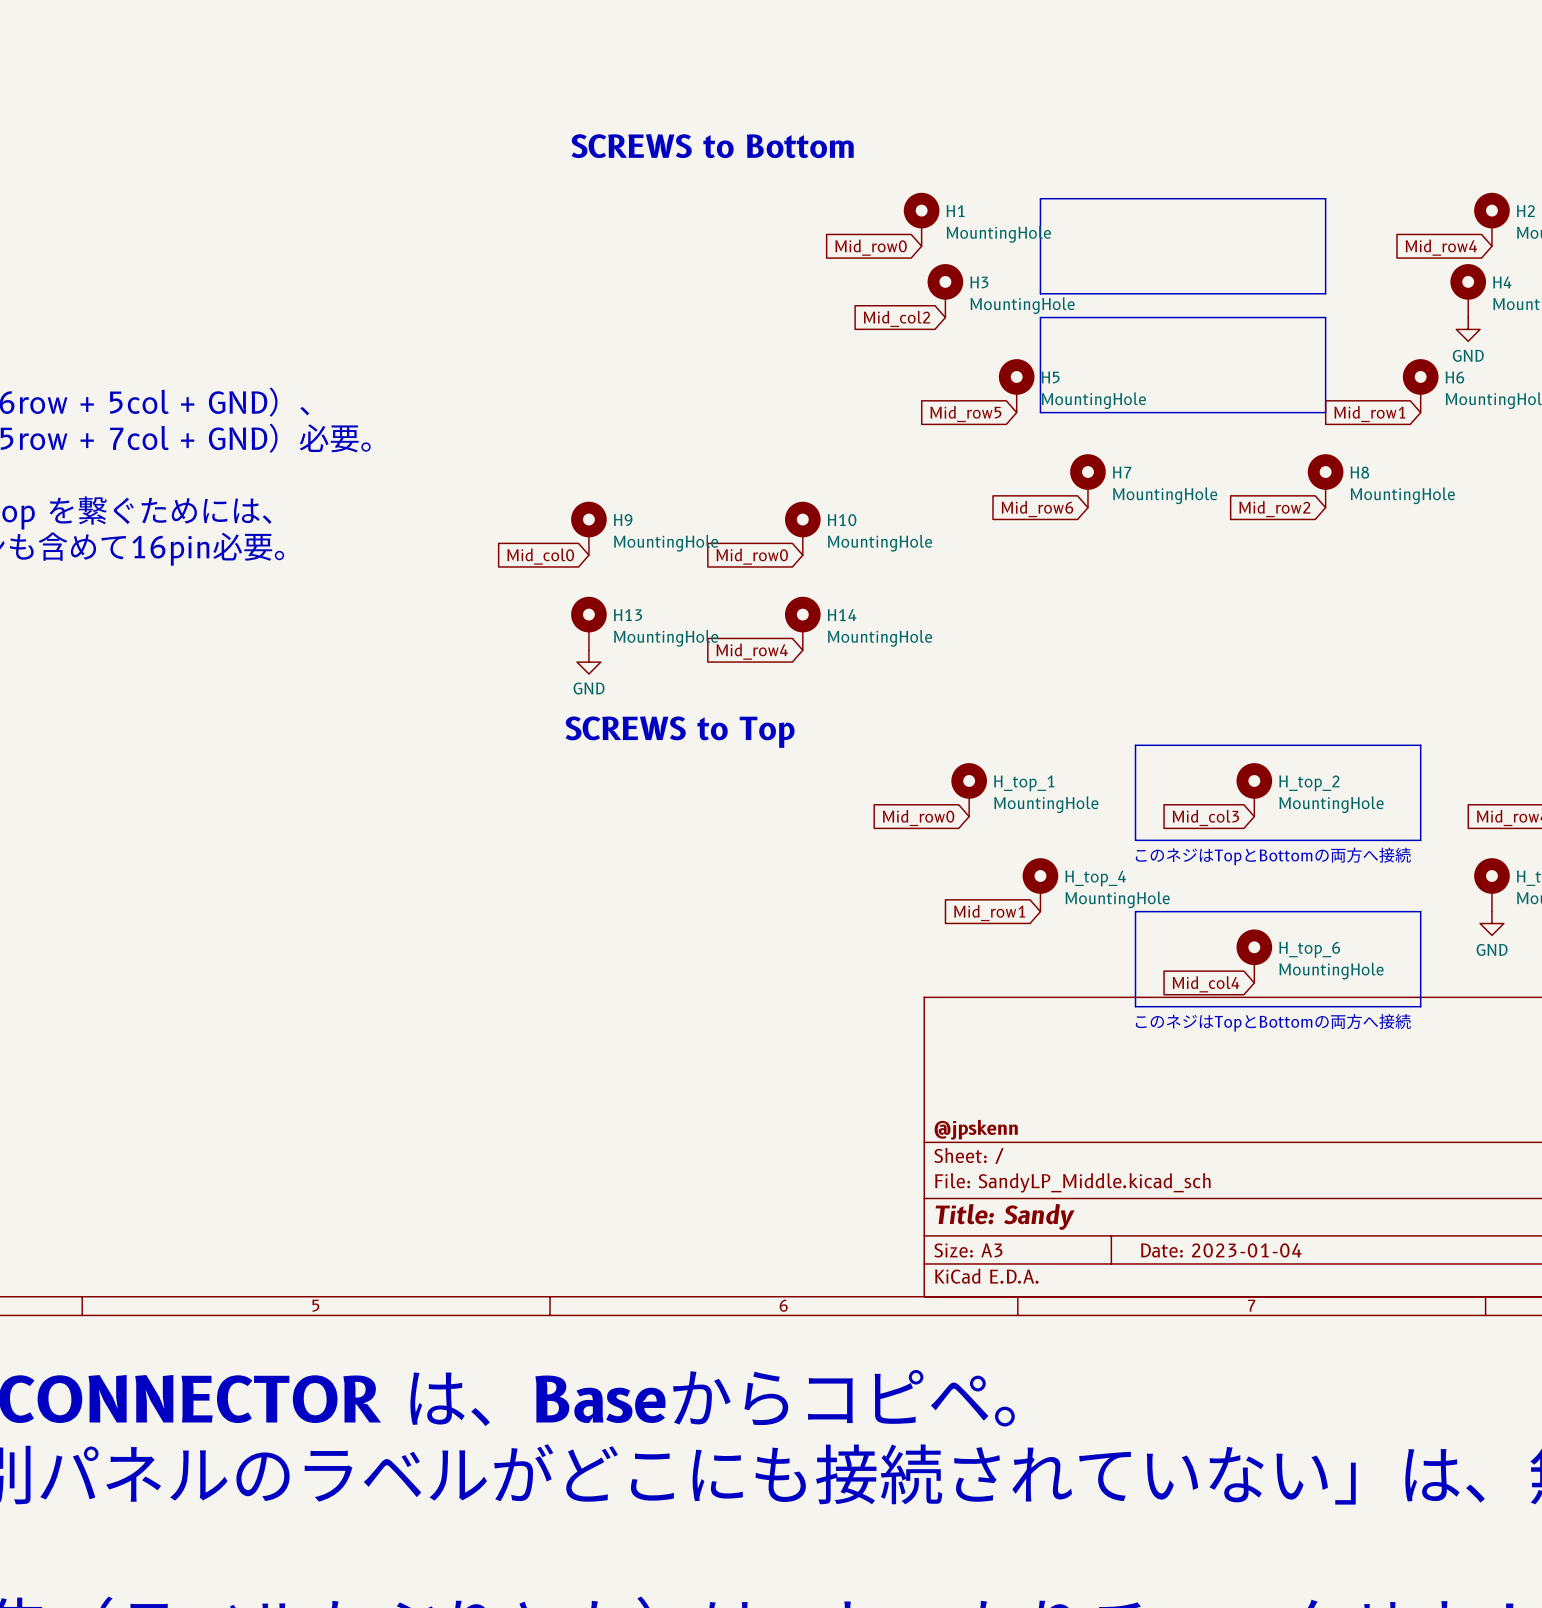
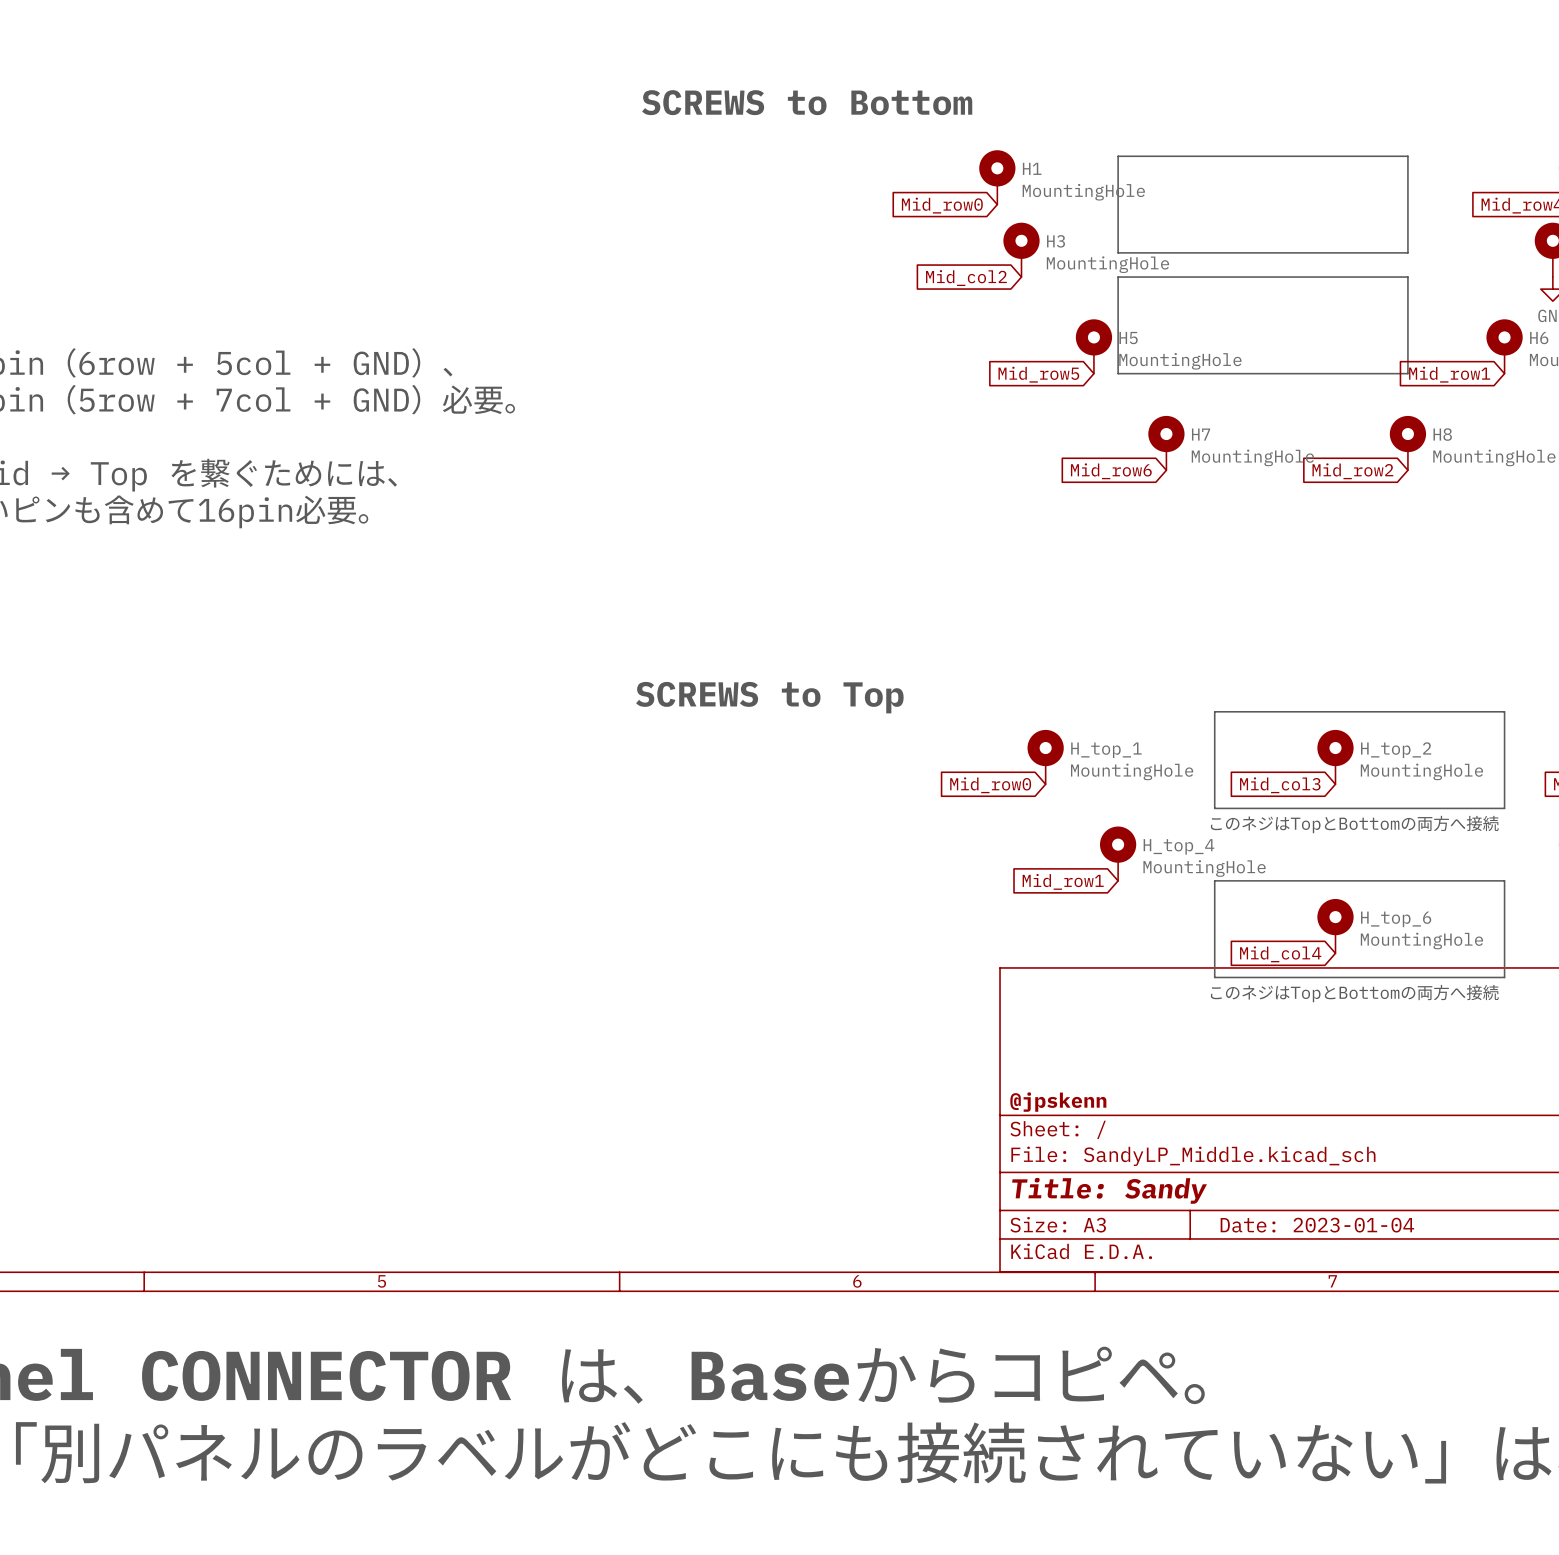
H9: MountingHole (588, 528) -> none
H10: MountingHole (802, 528) -> none
global label: Mid_col0 (540, 556) -> none
global label: Mid_row0 (752, 556) -> none
H13: MountingHole (588, 623) -> none
H14: MountingHole (802, 623) -> none
global label: Mid_row4 (752, 651) -> none
power symbol: GND (588, 662) -> none

